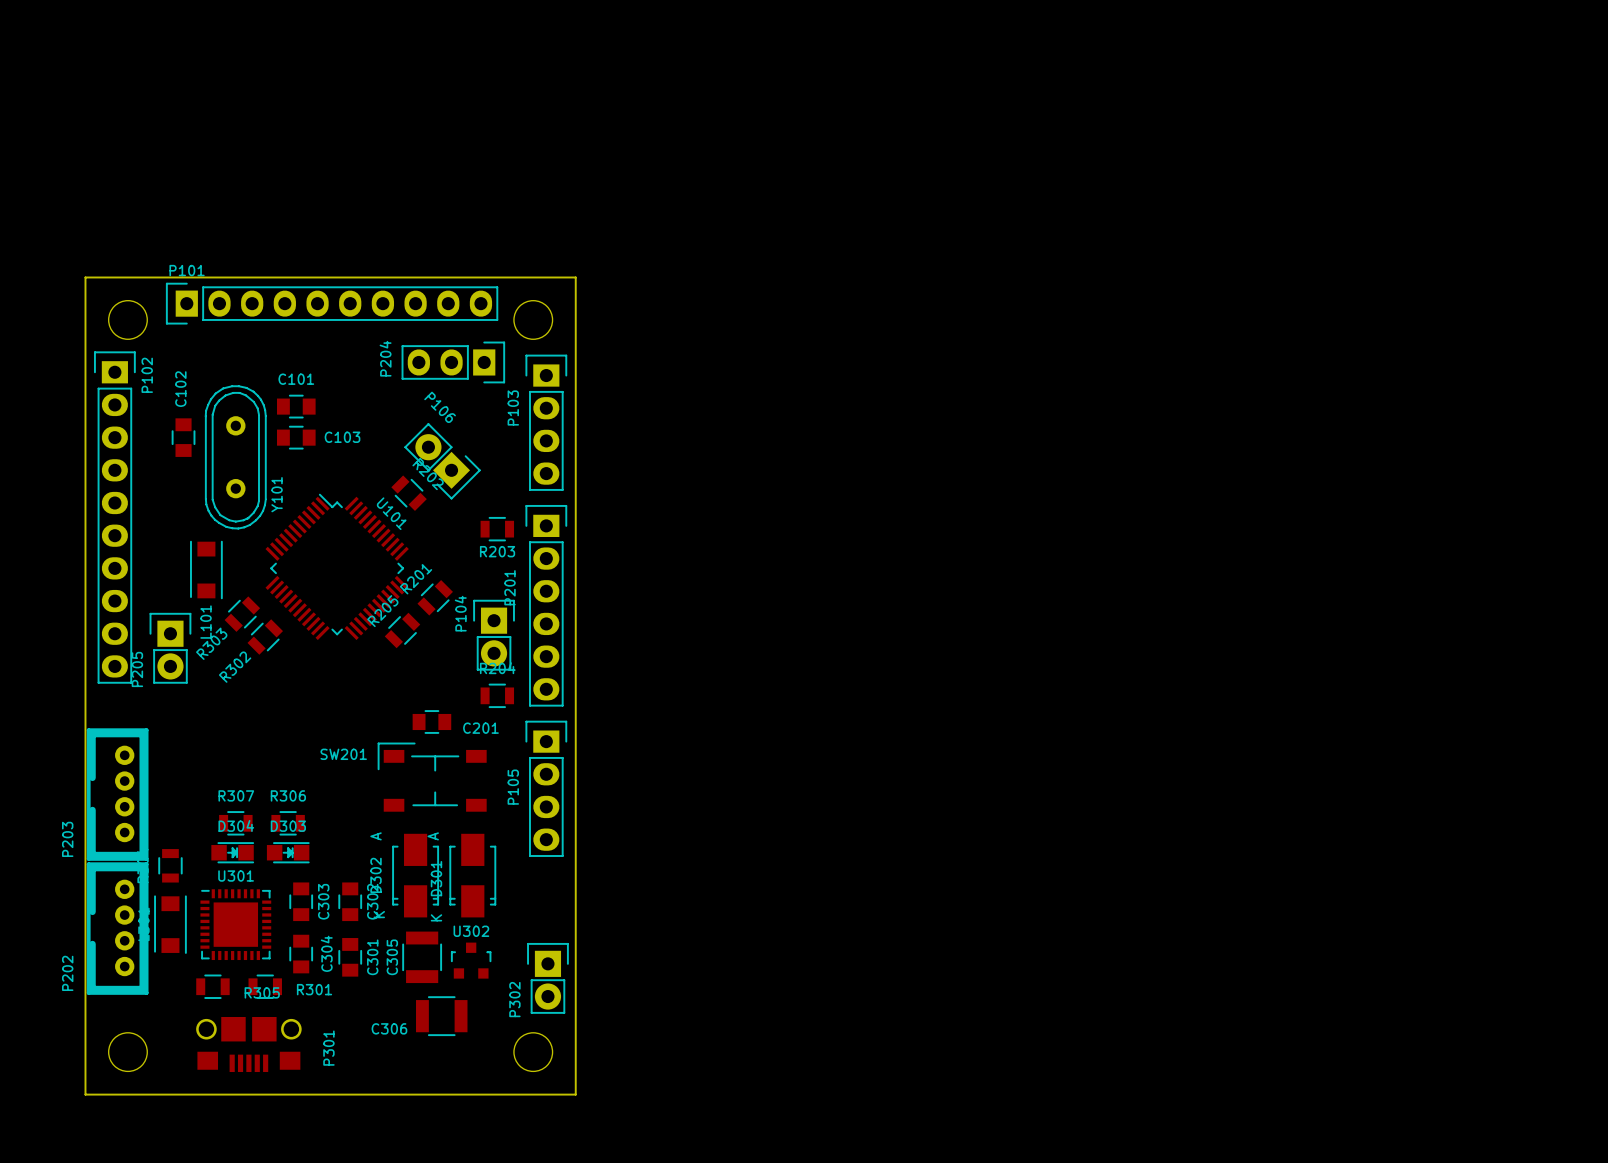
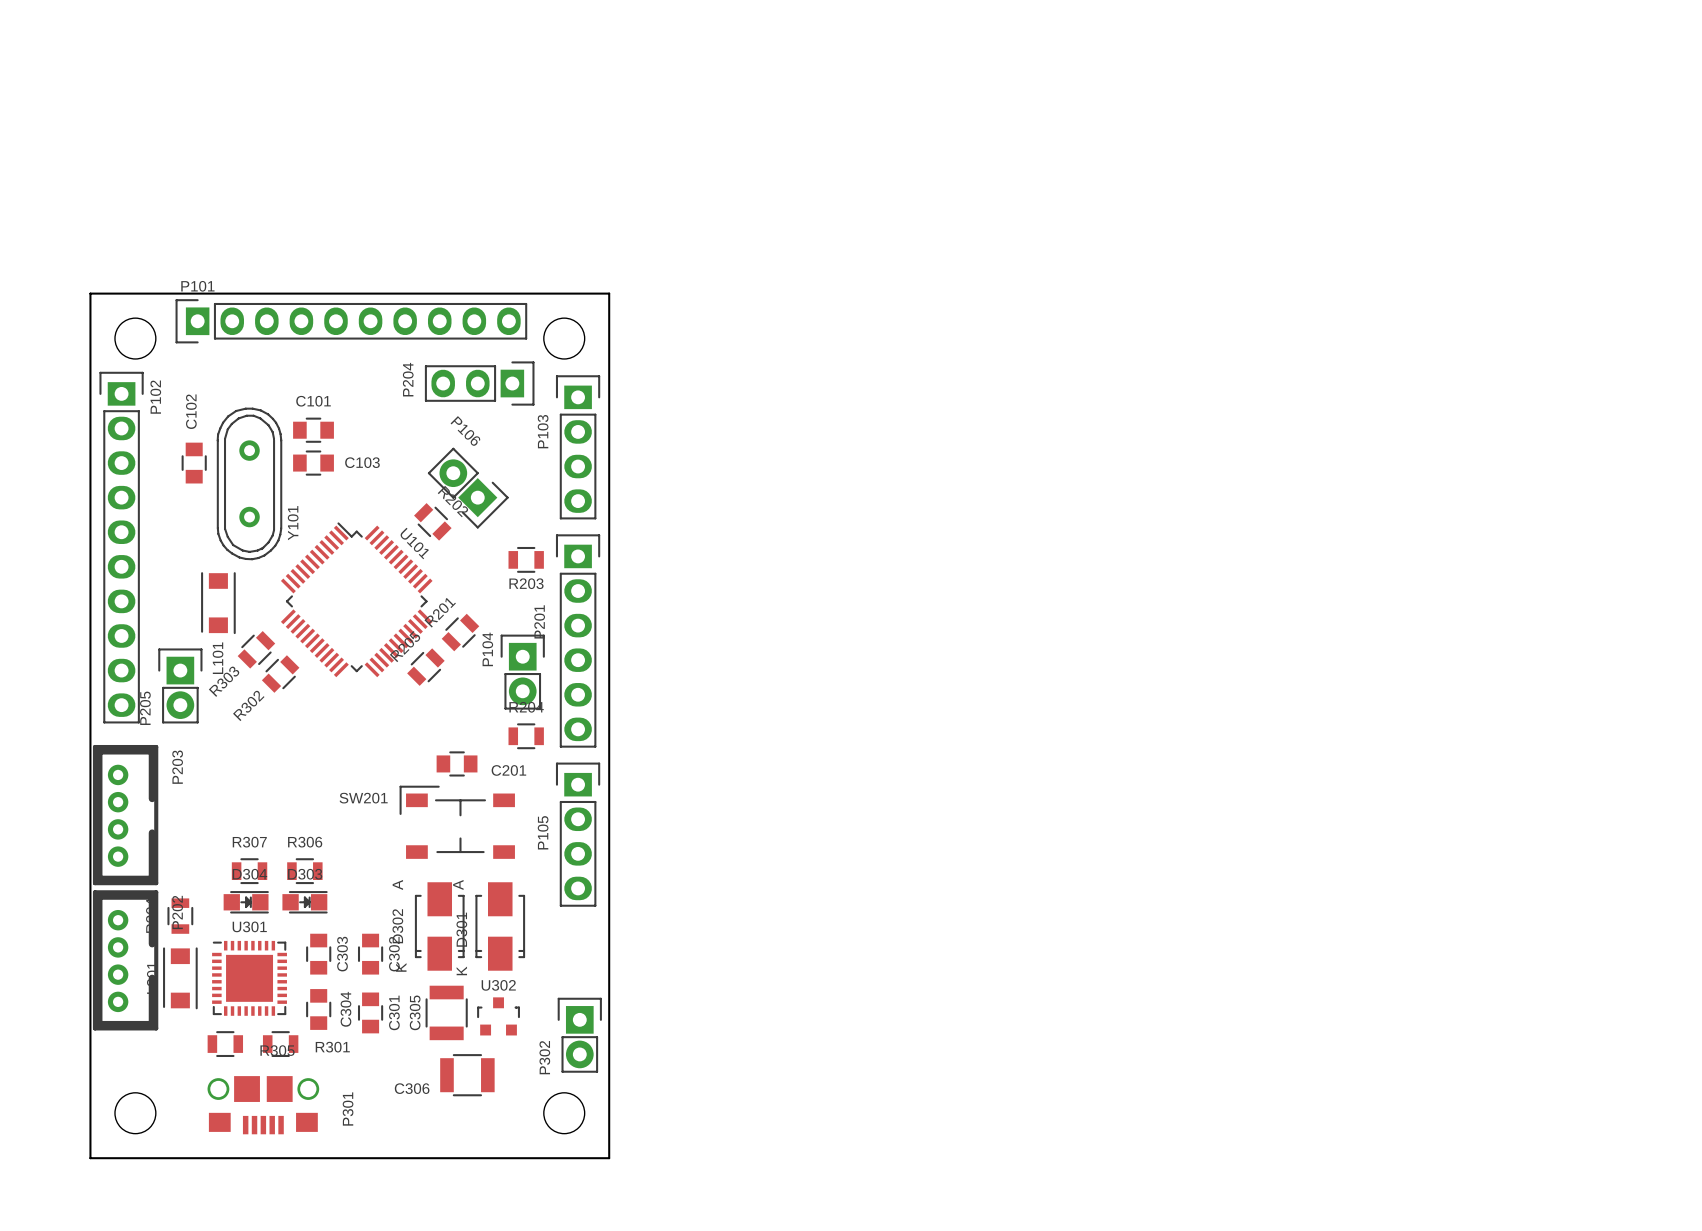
P203 rotation: 0° (117, 794) -> 180° (125, 815)
P202 rotation: 0° (117, 928) -> 180° (125, 960)

